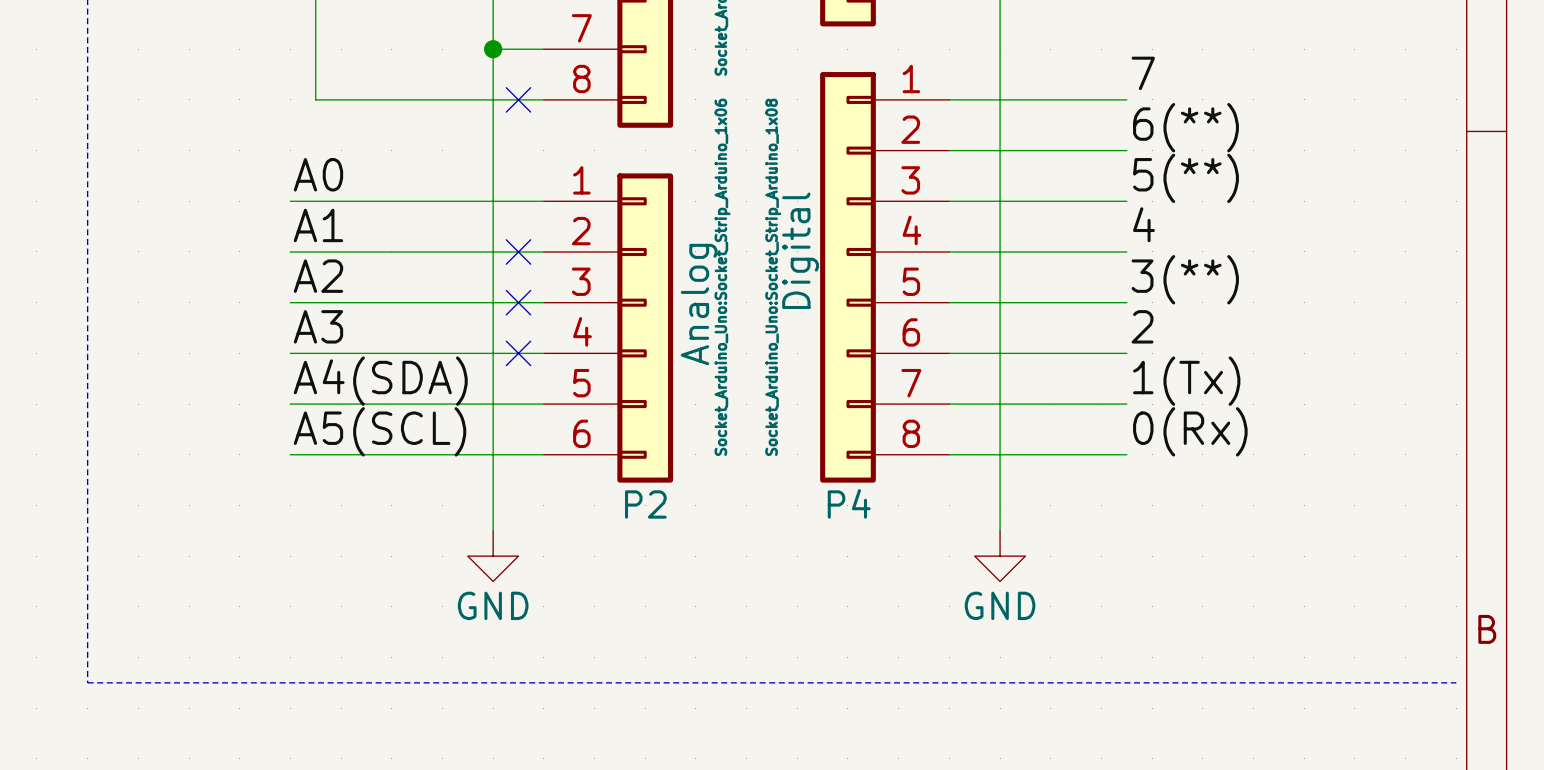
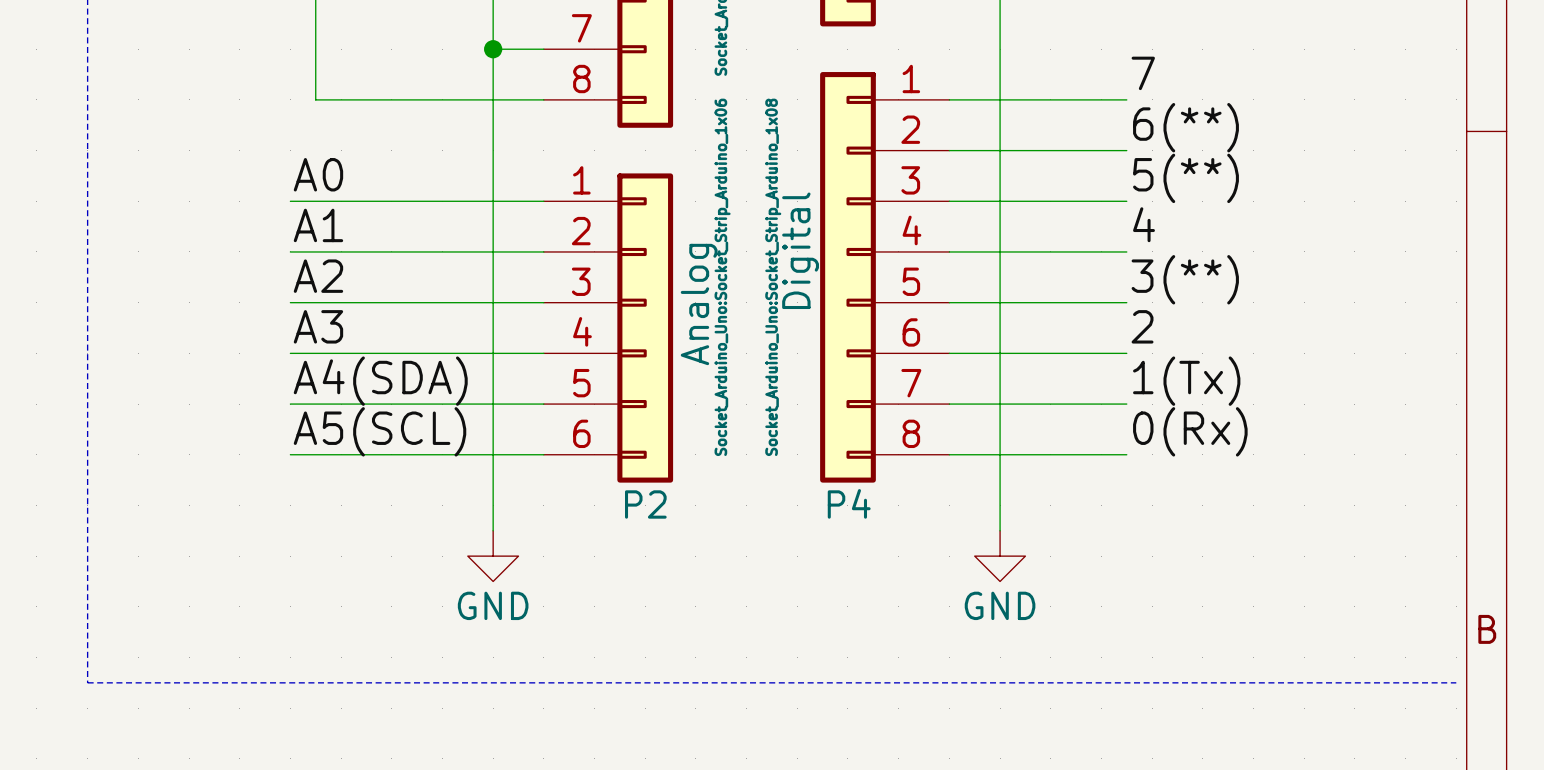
no-connect mark: (518, 99) -> none
no-connect mark: (518, 251) -> none
no-connect mark: (518, 302) -> none
no-connect mark: (518, 353) -> none

